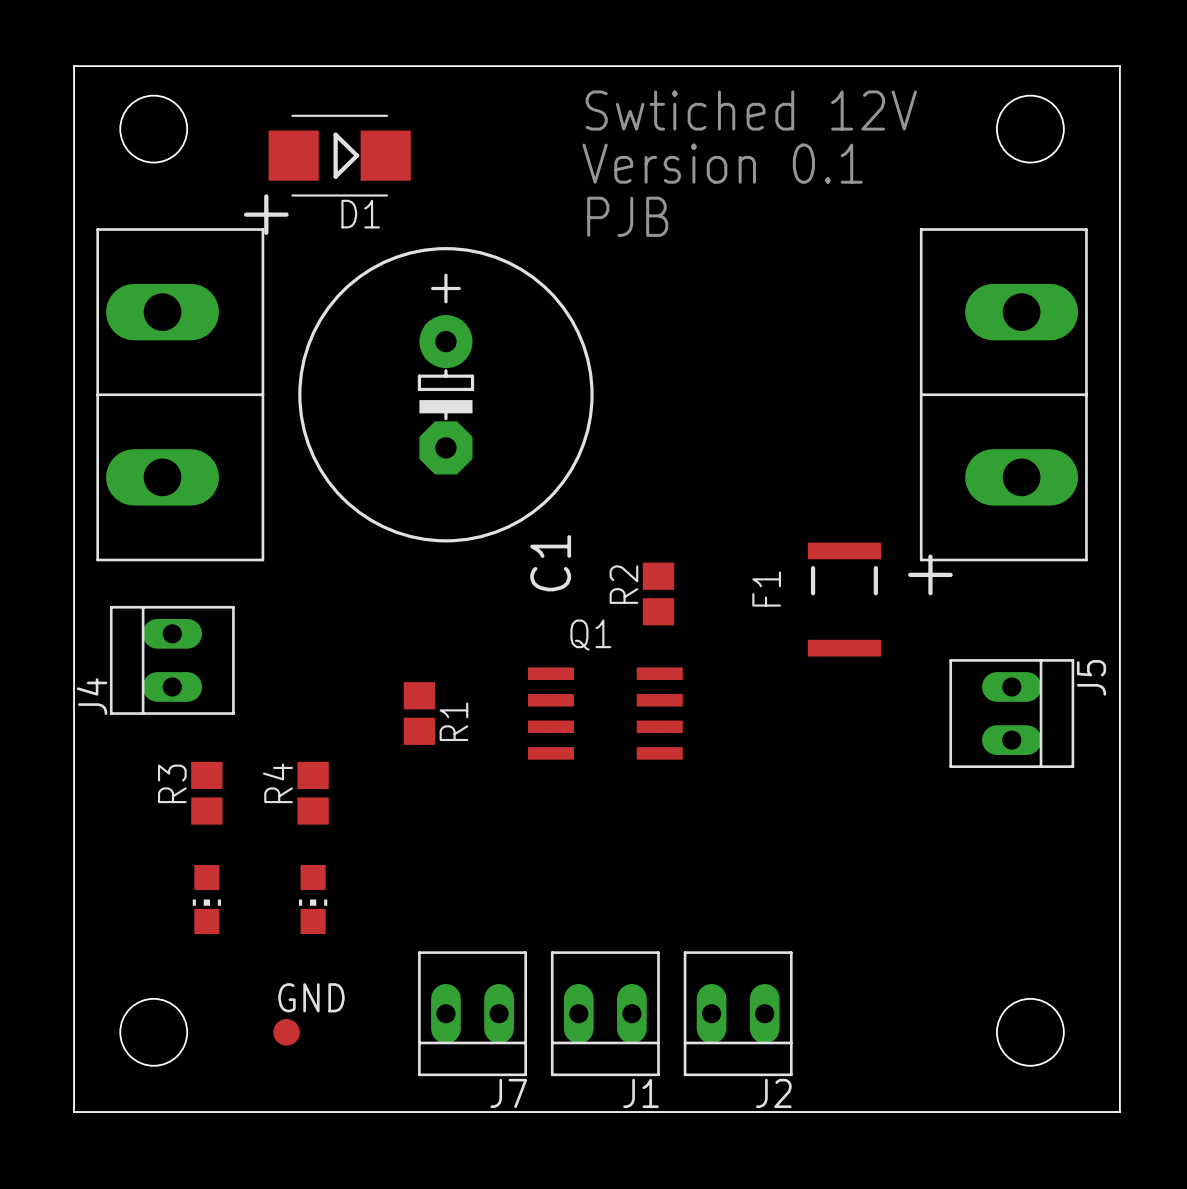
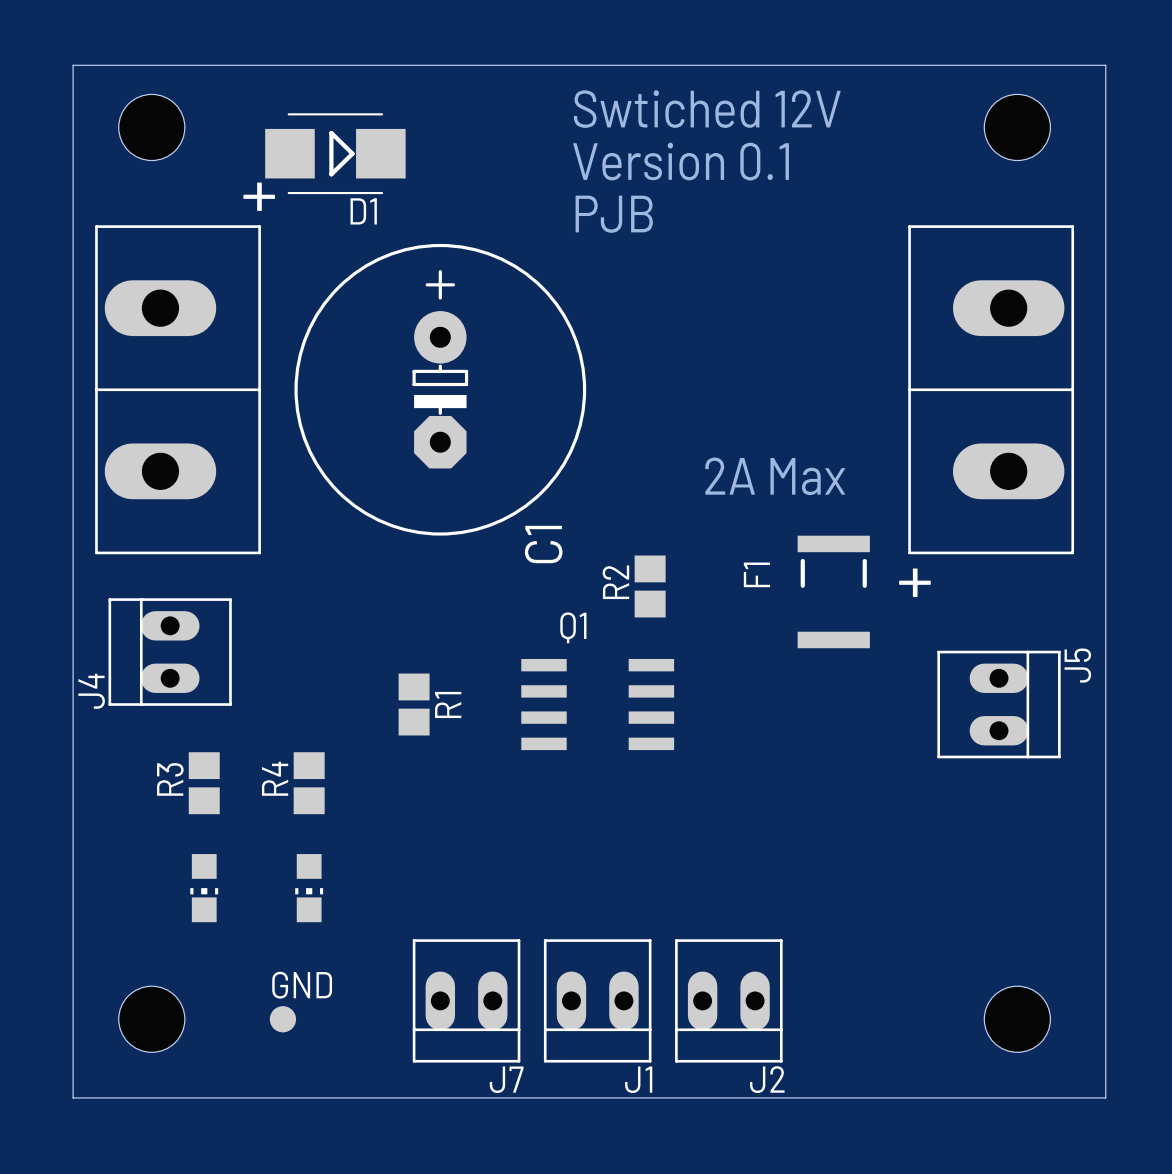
text: none -> 2A Max (775, 476)

